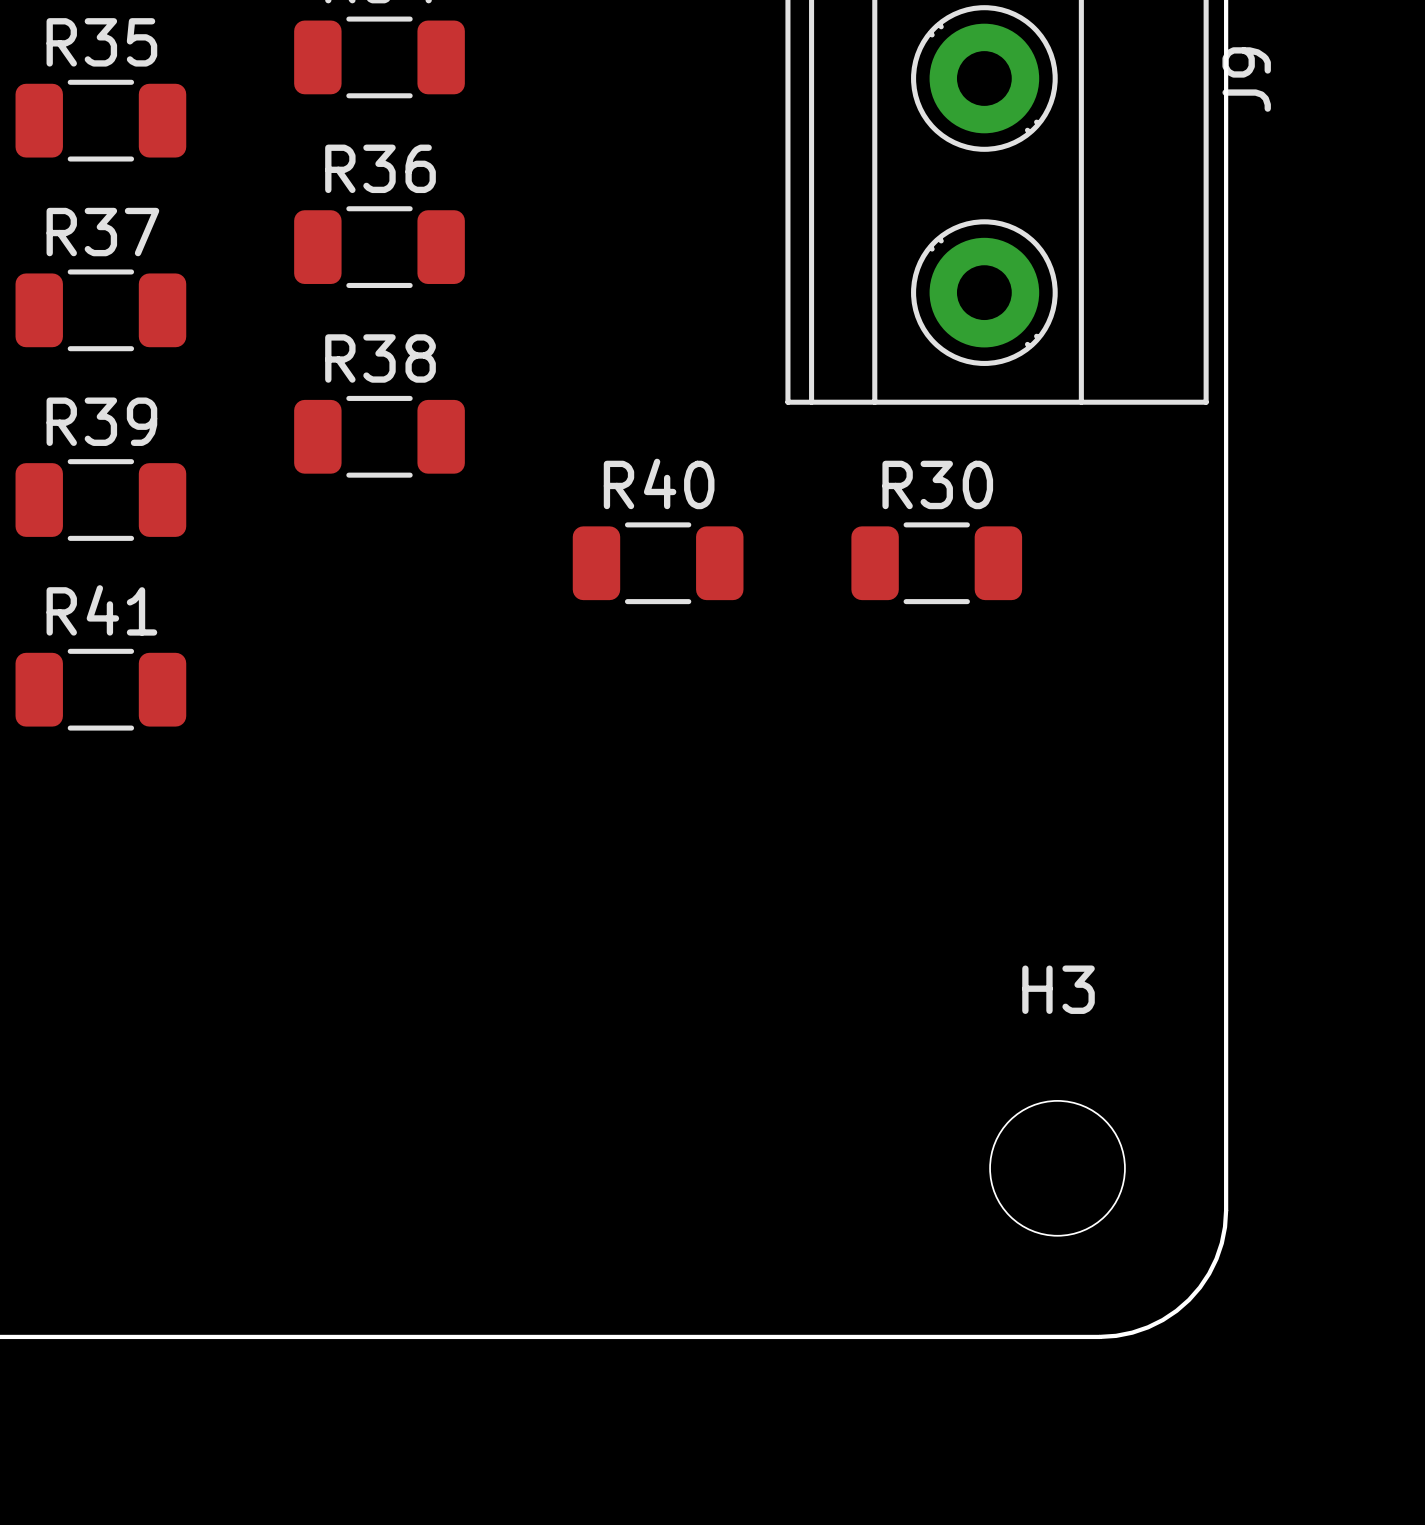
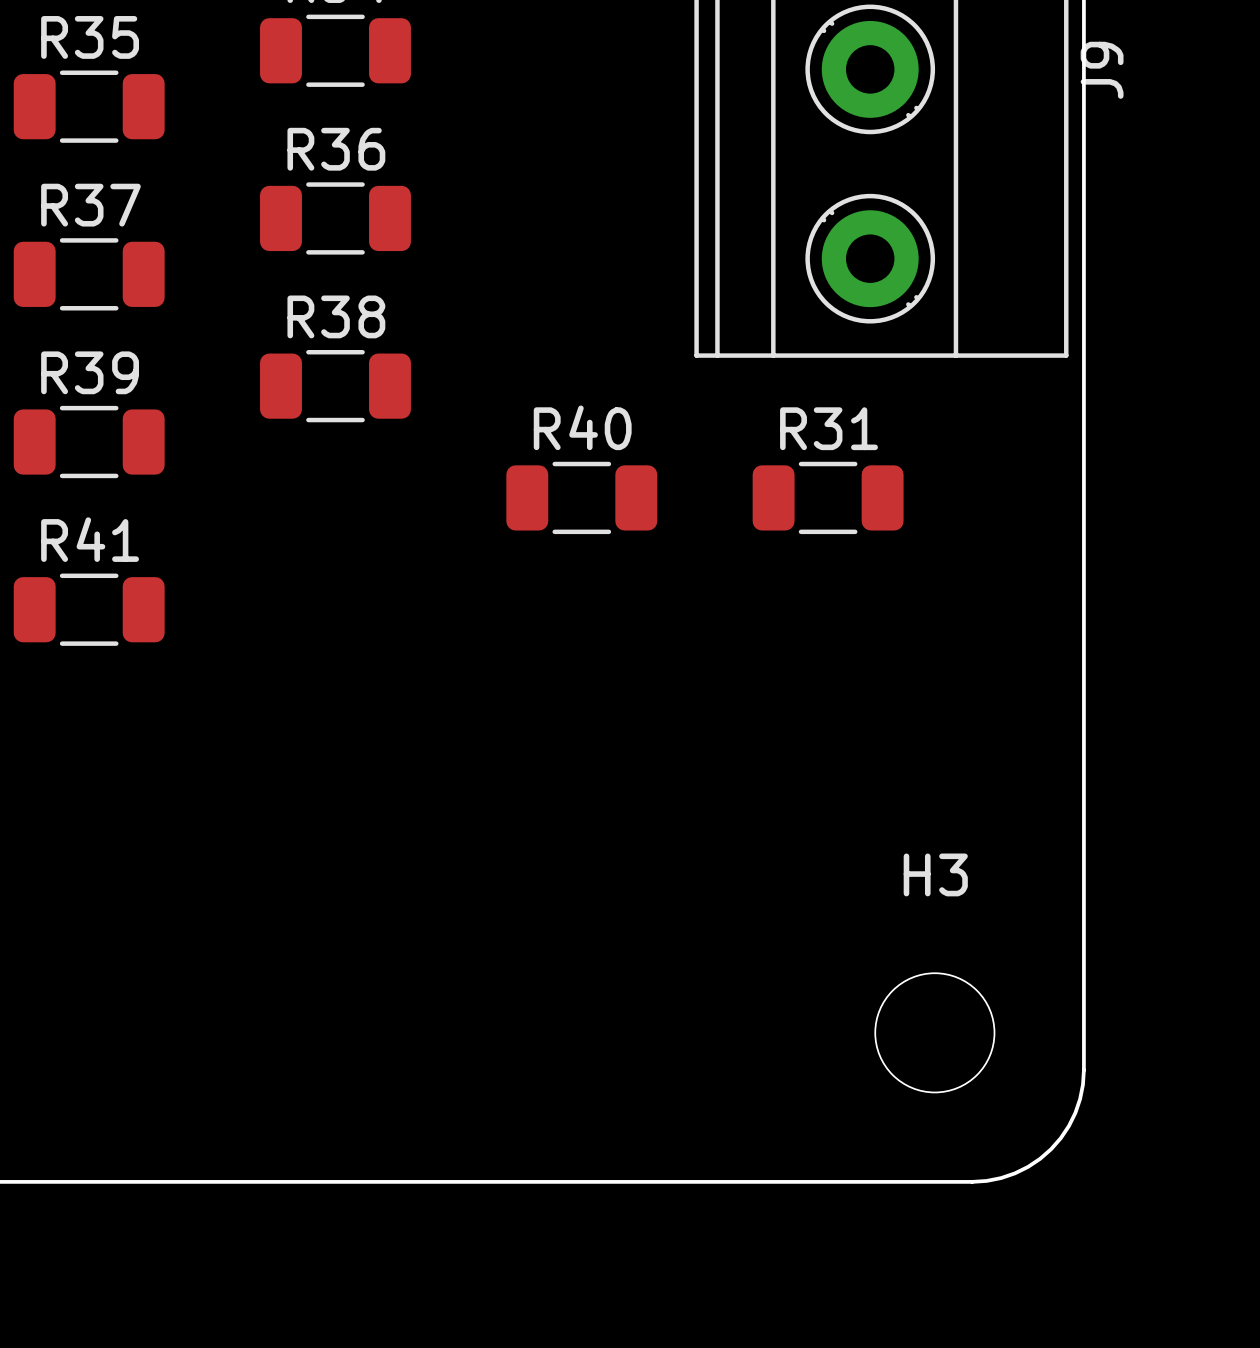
R30 name: R30 (937, 484) -> R31 (829, 428)

